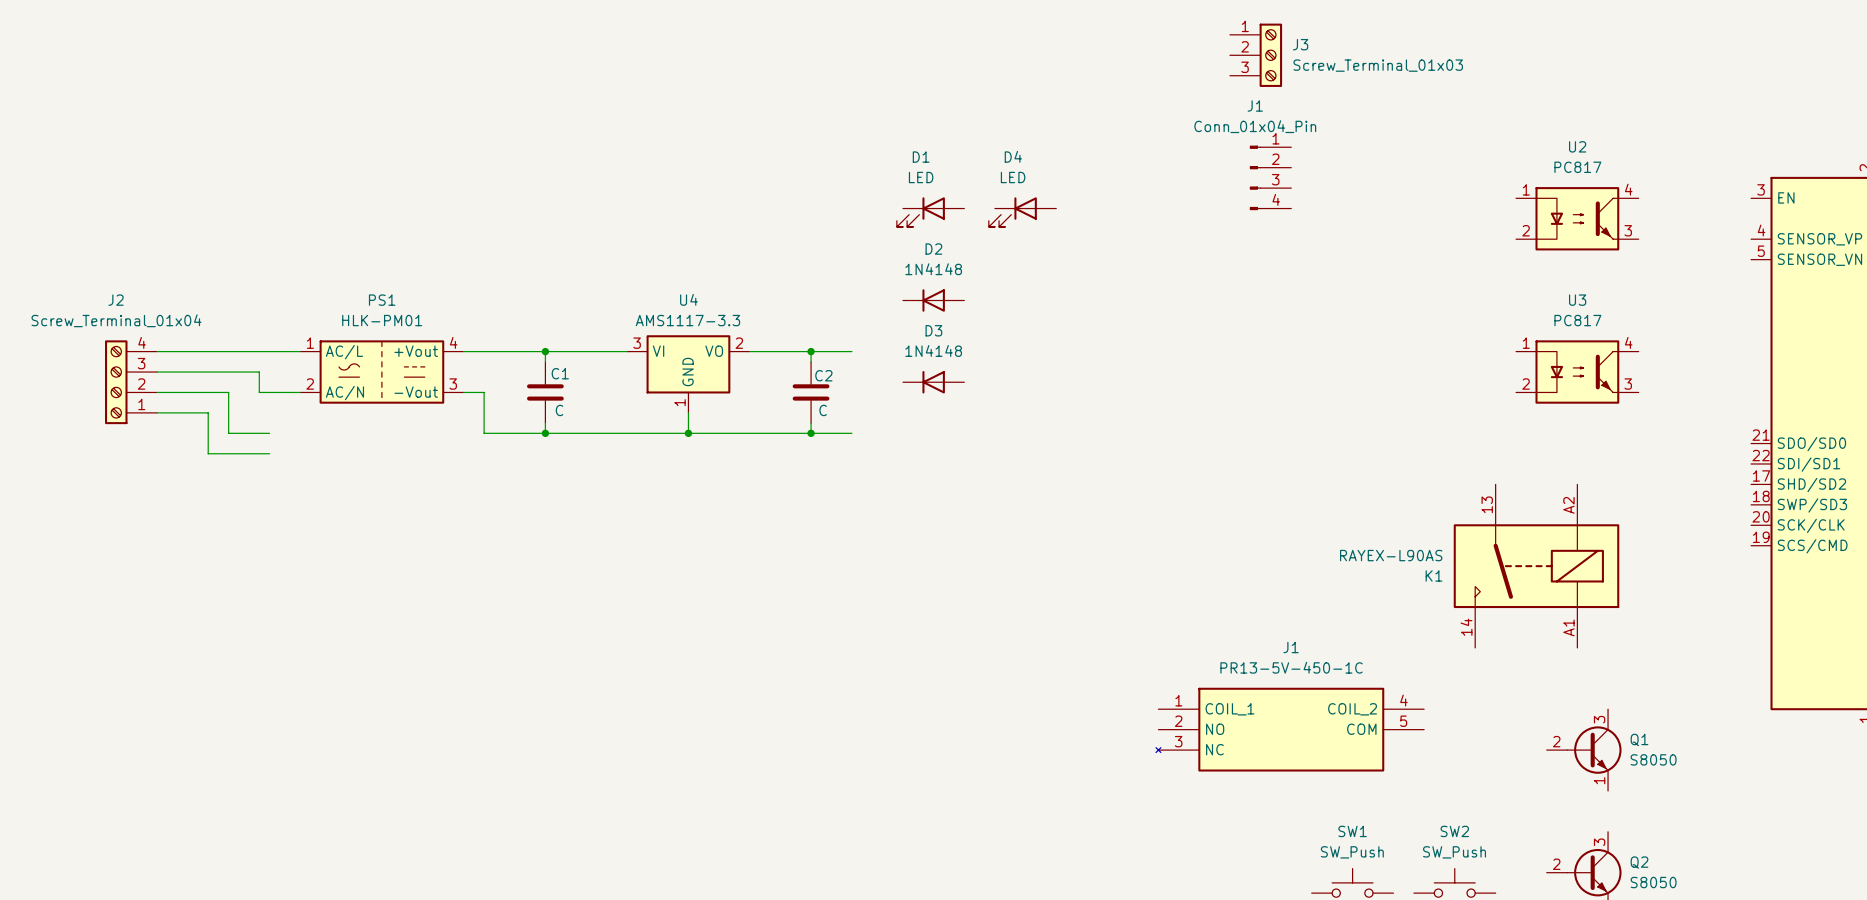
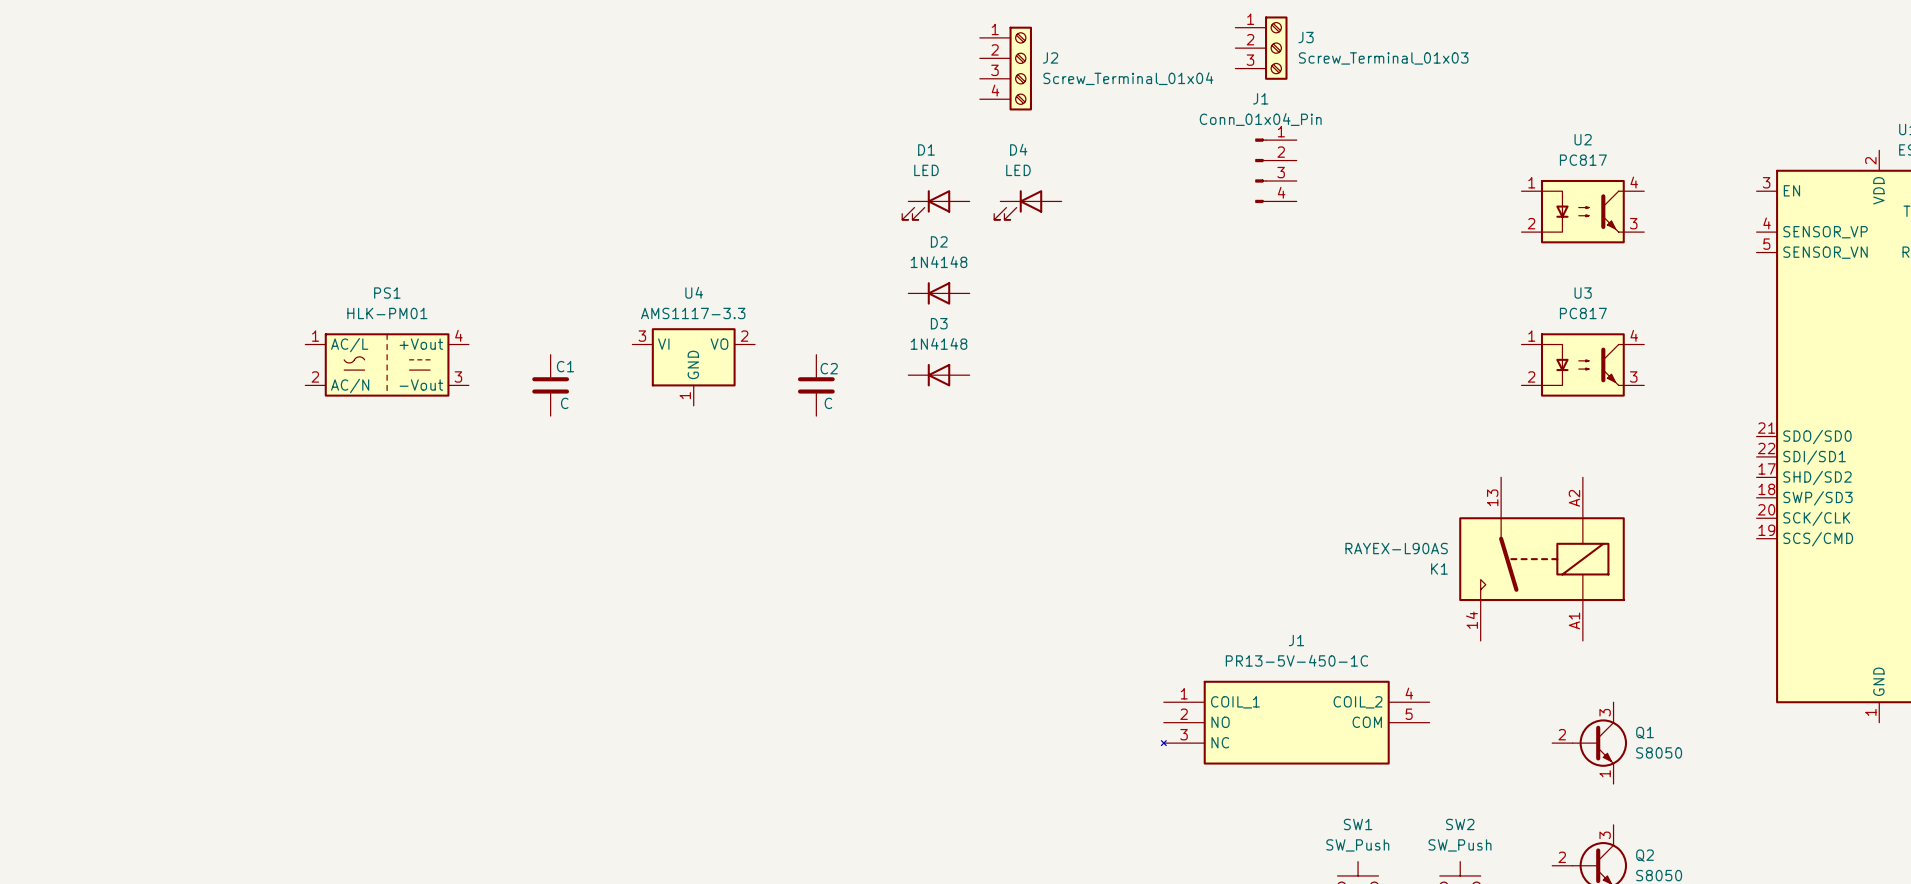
J2 name position: J2 (116, 300) -> J2 (1050, 57)
J2 value position: Screw_Terminal_01x04 (116, 320) -> Screw_Terminal_01x04 (1128, 78)
wire: (157, 351) (300, 351) -> none
wire: (463, 351) (627, 351) -> none
wire: (545, 351) (545, 361) -> none
junction: (545, 351) -> none
wire: (749, 351) (851, 351) -> none
wire: (811, 351) (811, 361) -> none
junction: (811, 351) -> none
wire: (157, 372) (259, 372) (259, 392) (300, 392) -> none
J2 rotation: 0° (116, 382) -> 180° (1020, 68)
J2 position: (131, 382) -> (1005, 68)
wire: (157, 392) (228, 392) (228, 433) (269, 433) -> none
wire: (463, 392) (484, 392) (484, 433) (851, 433) -> none
wire: (157, 412) (208, 412) (208, 453) (269, 453) -> none
wire: (688, 412) (688, 433) -> none
wire: (545, 423) (545, 433) -> none
wire: (811, 423) (811, 433) -> none
junction: (545, 433) -> none
junction: (688, 433) -> none
junction: (811, 433) -> none

